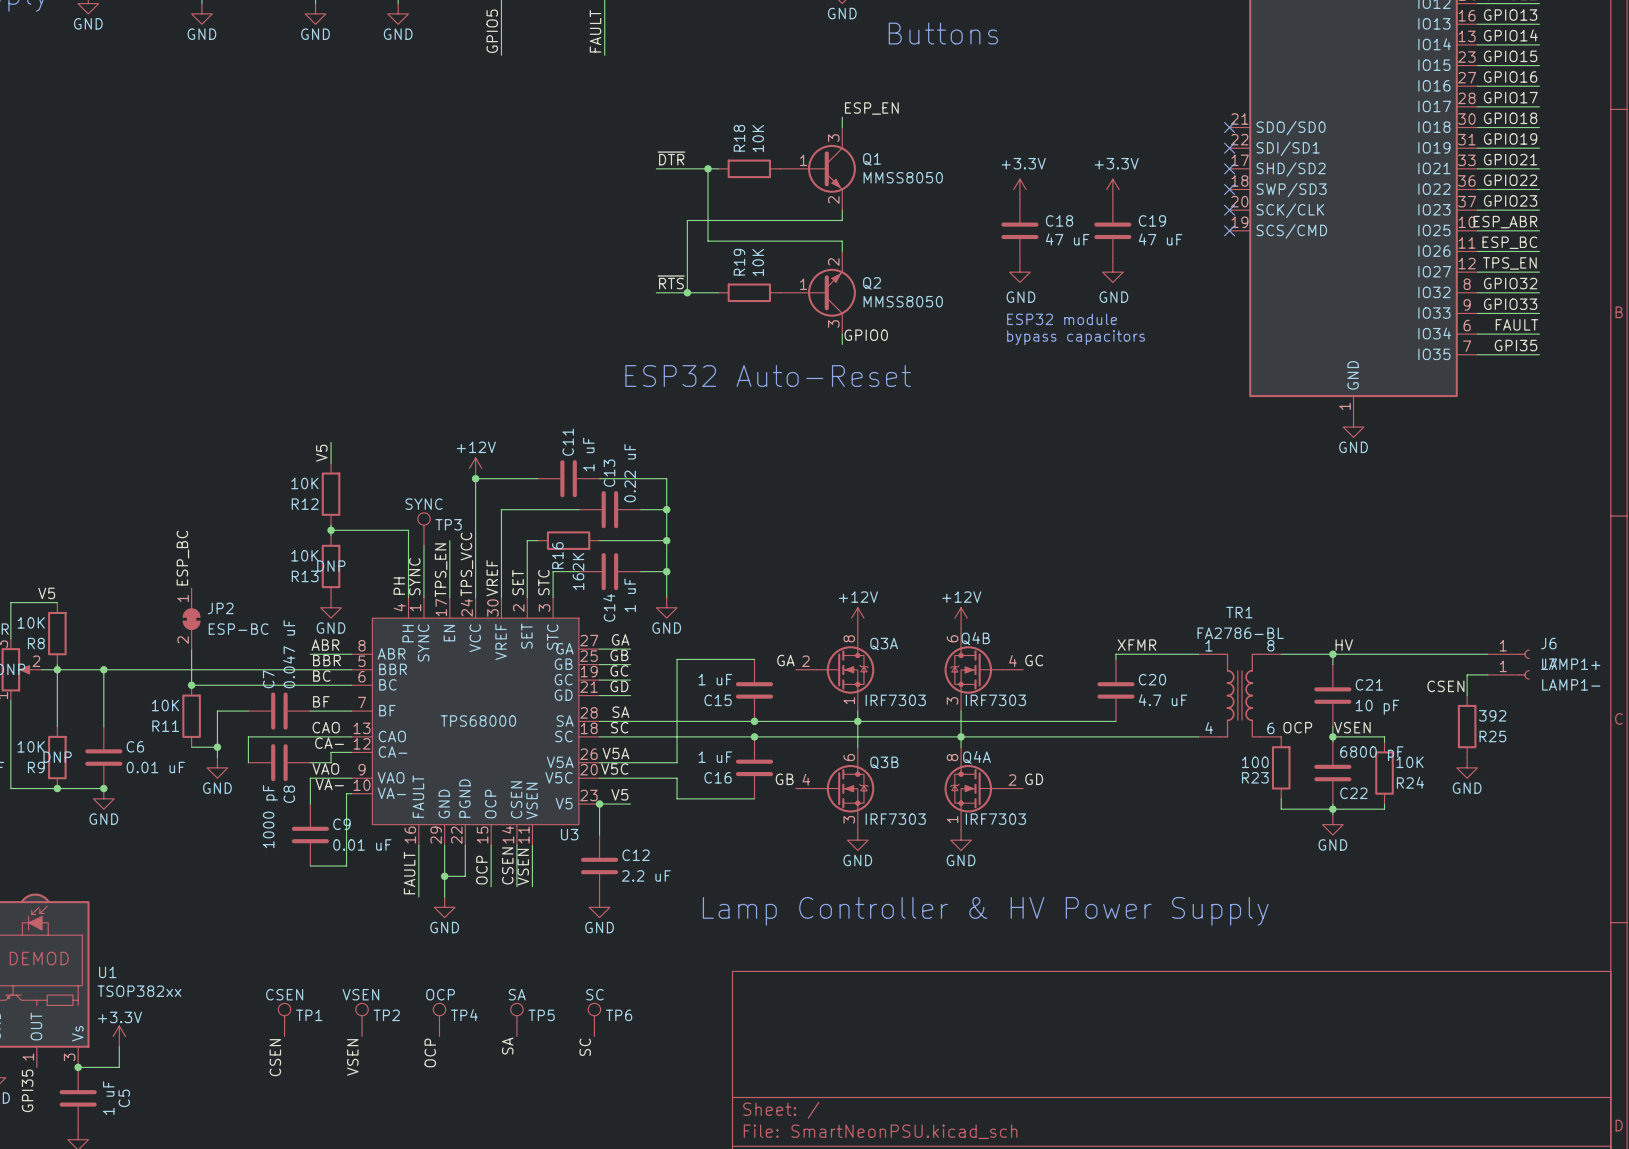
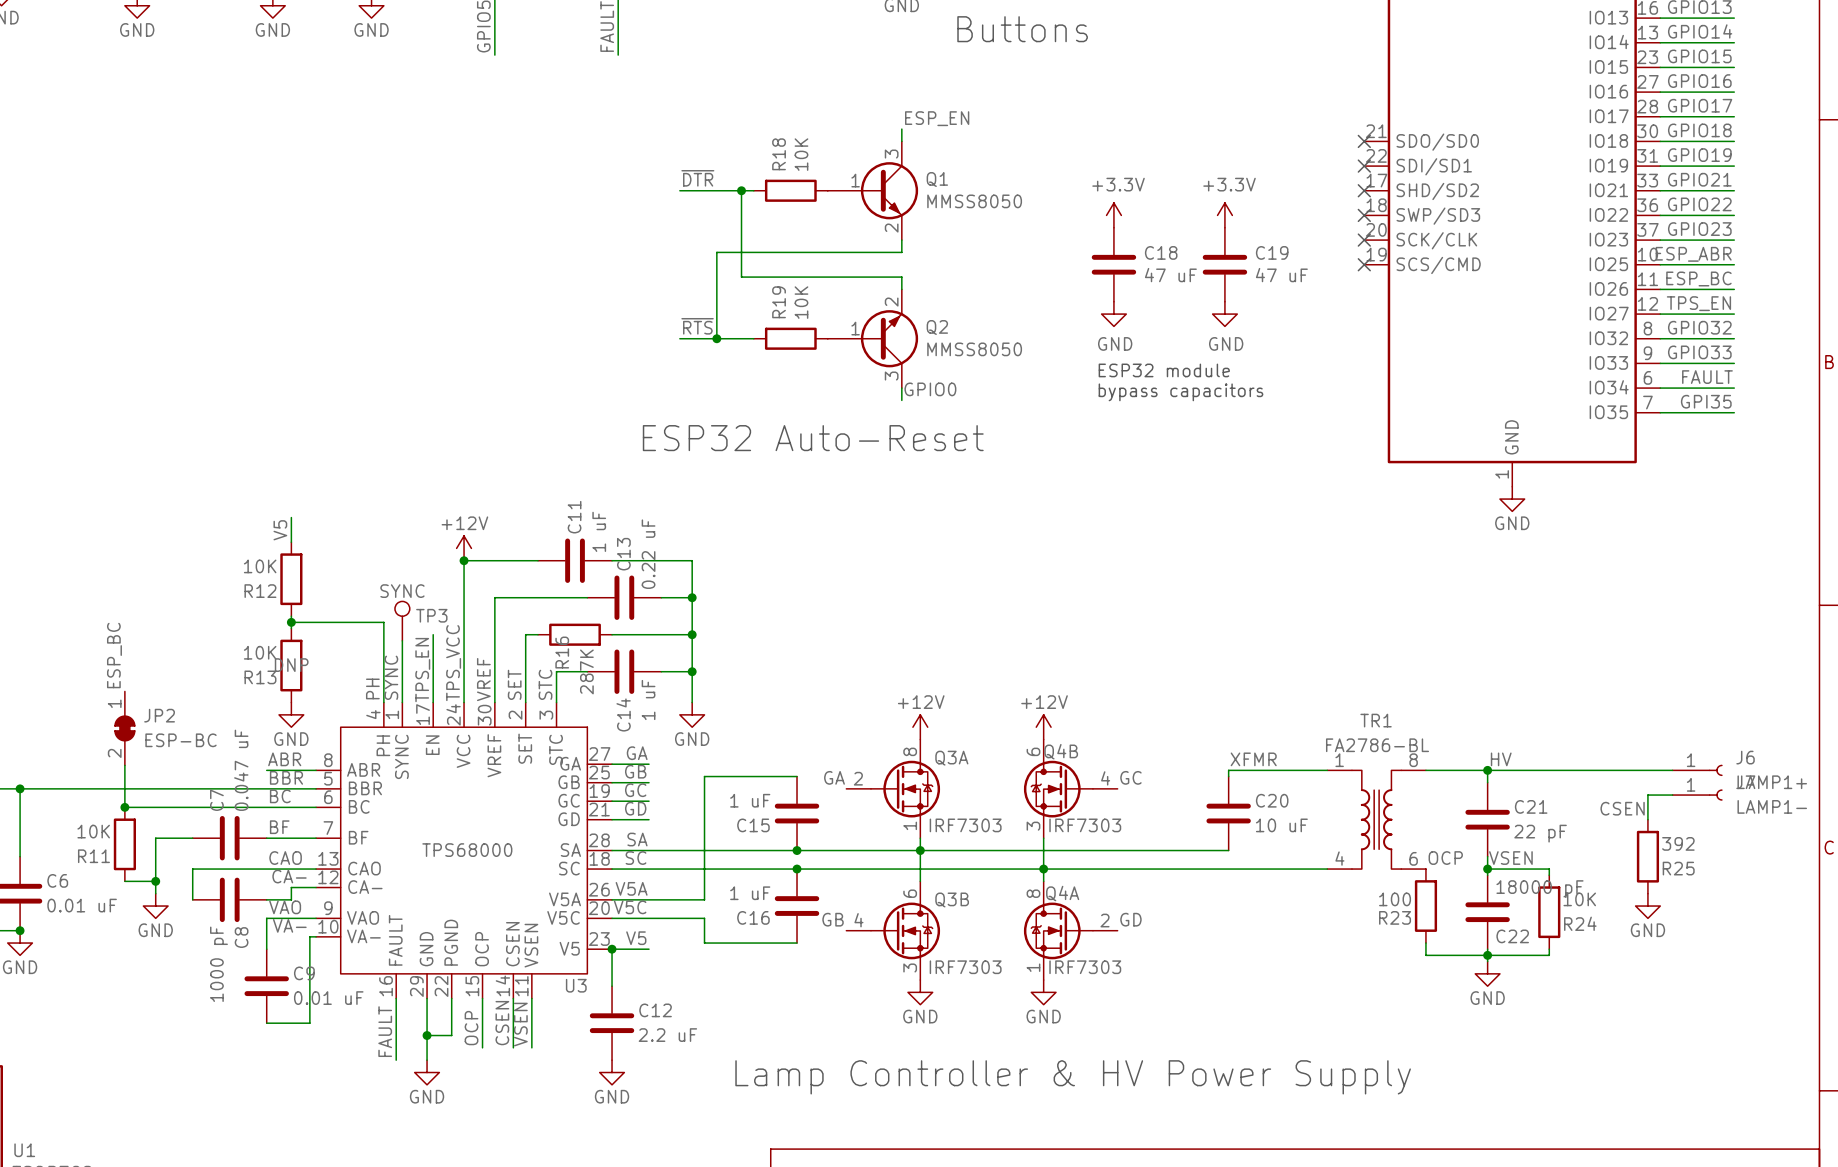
R16 value: 162K (578, 571) -> 287K (586, 671)
C20 value: 4.7 uF (1163, 700) -> 10 uF (1281, 825)
C21 value: 10 pF (1377, 707) -> 22 pF (1540, 833)
C22 value: 6800 pF (1371, 753) -> 18000 pF (1539, 889)

